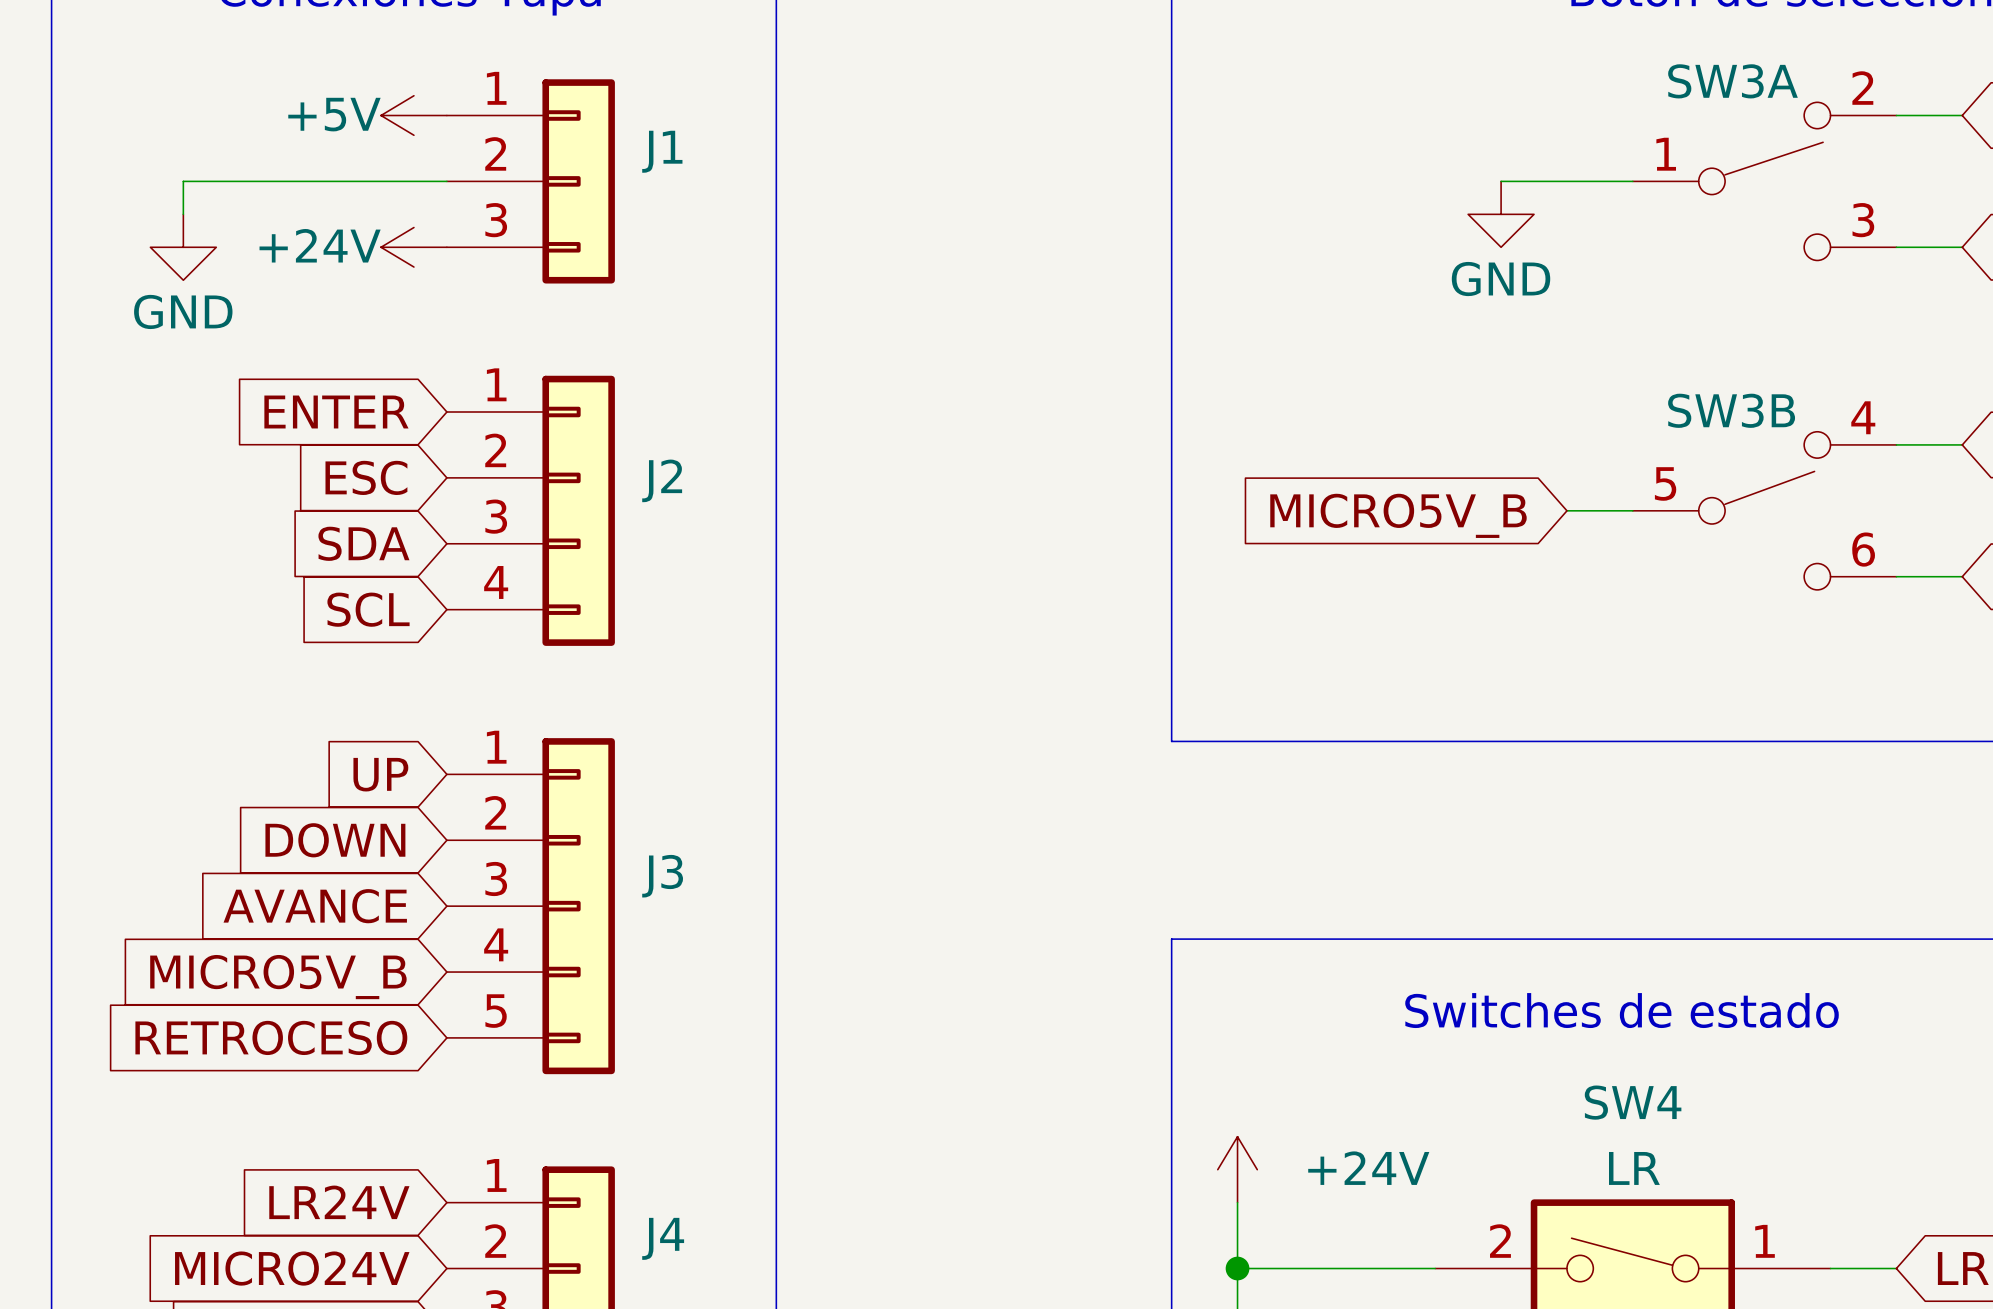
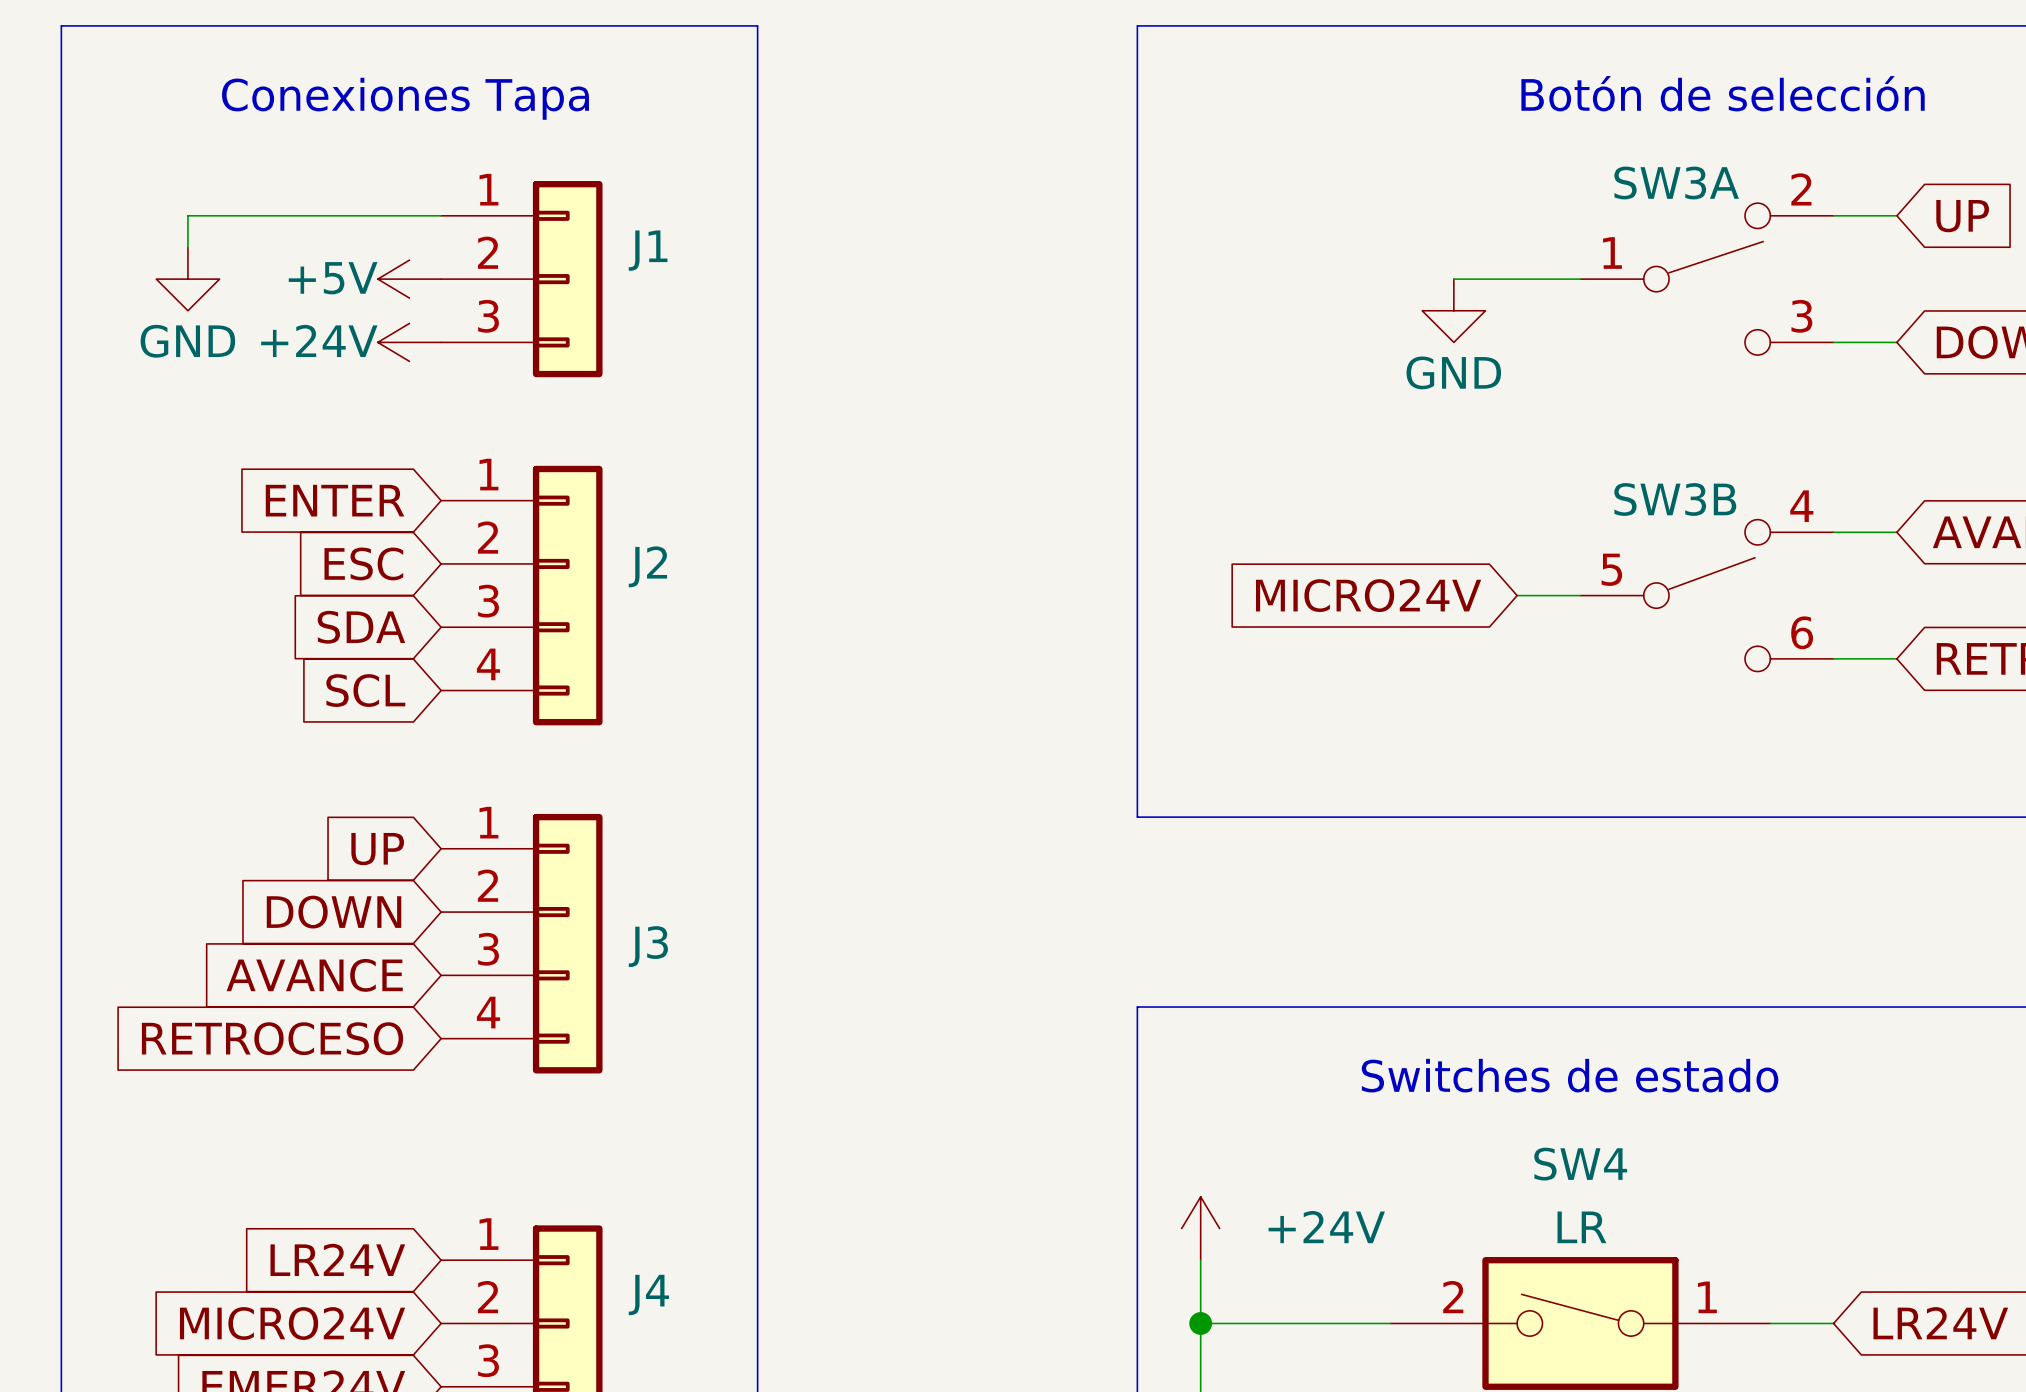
power symbol position: +5V (413, 115) -> +5V (409, 279)
wire: (446, 181) (183, 181) (183, 214) -> (441, 215) (187, 215) (187, 247)
power symbol position: GND (183, 247) -> GND (187, 279)
global label: MICRO5V_B (1398, 515) -> MICRO24V (1368, 595)
J3 symbol: [446, 738, 615, 1075] -> [441, 813, 603, 1074]
global label: MICRO5V_B (278, 977) -> RETROCESO (272, 1038)
global label: RETROCESO (271, 1037) -> none

